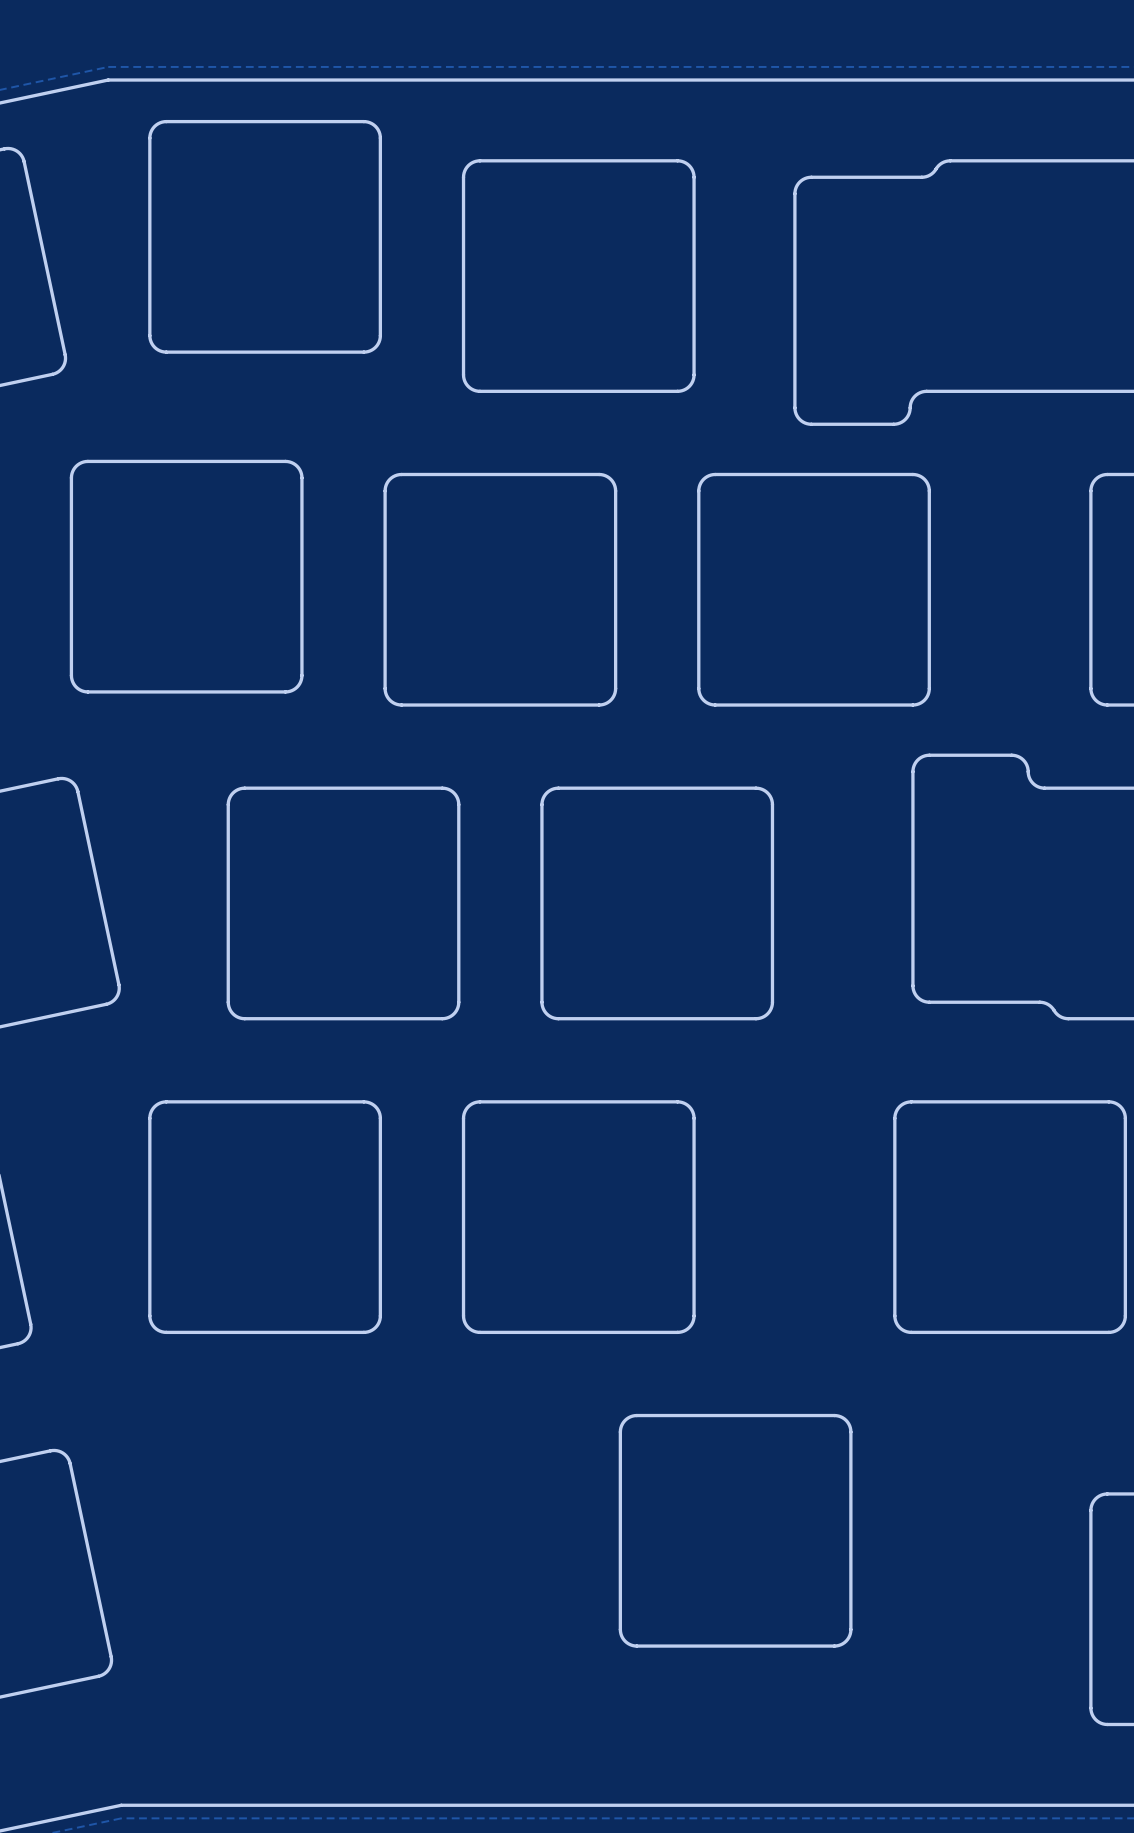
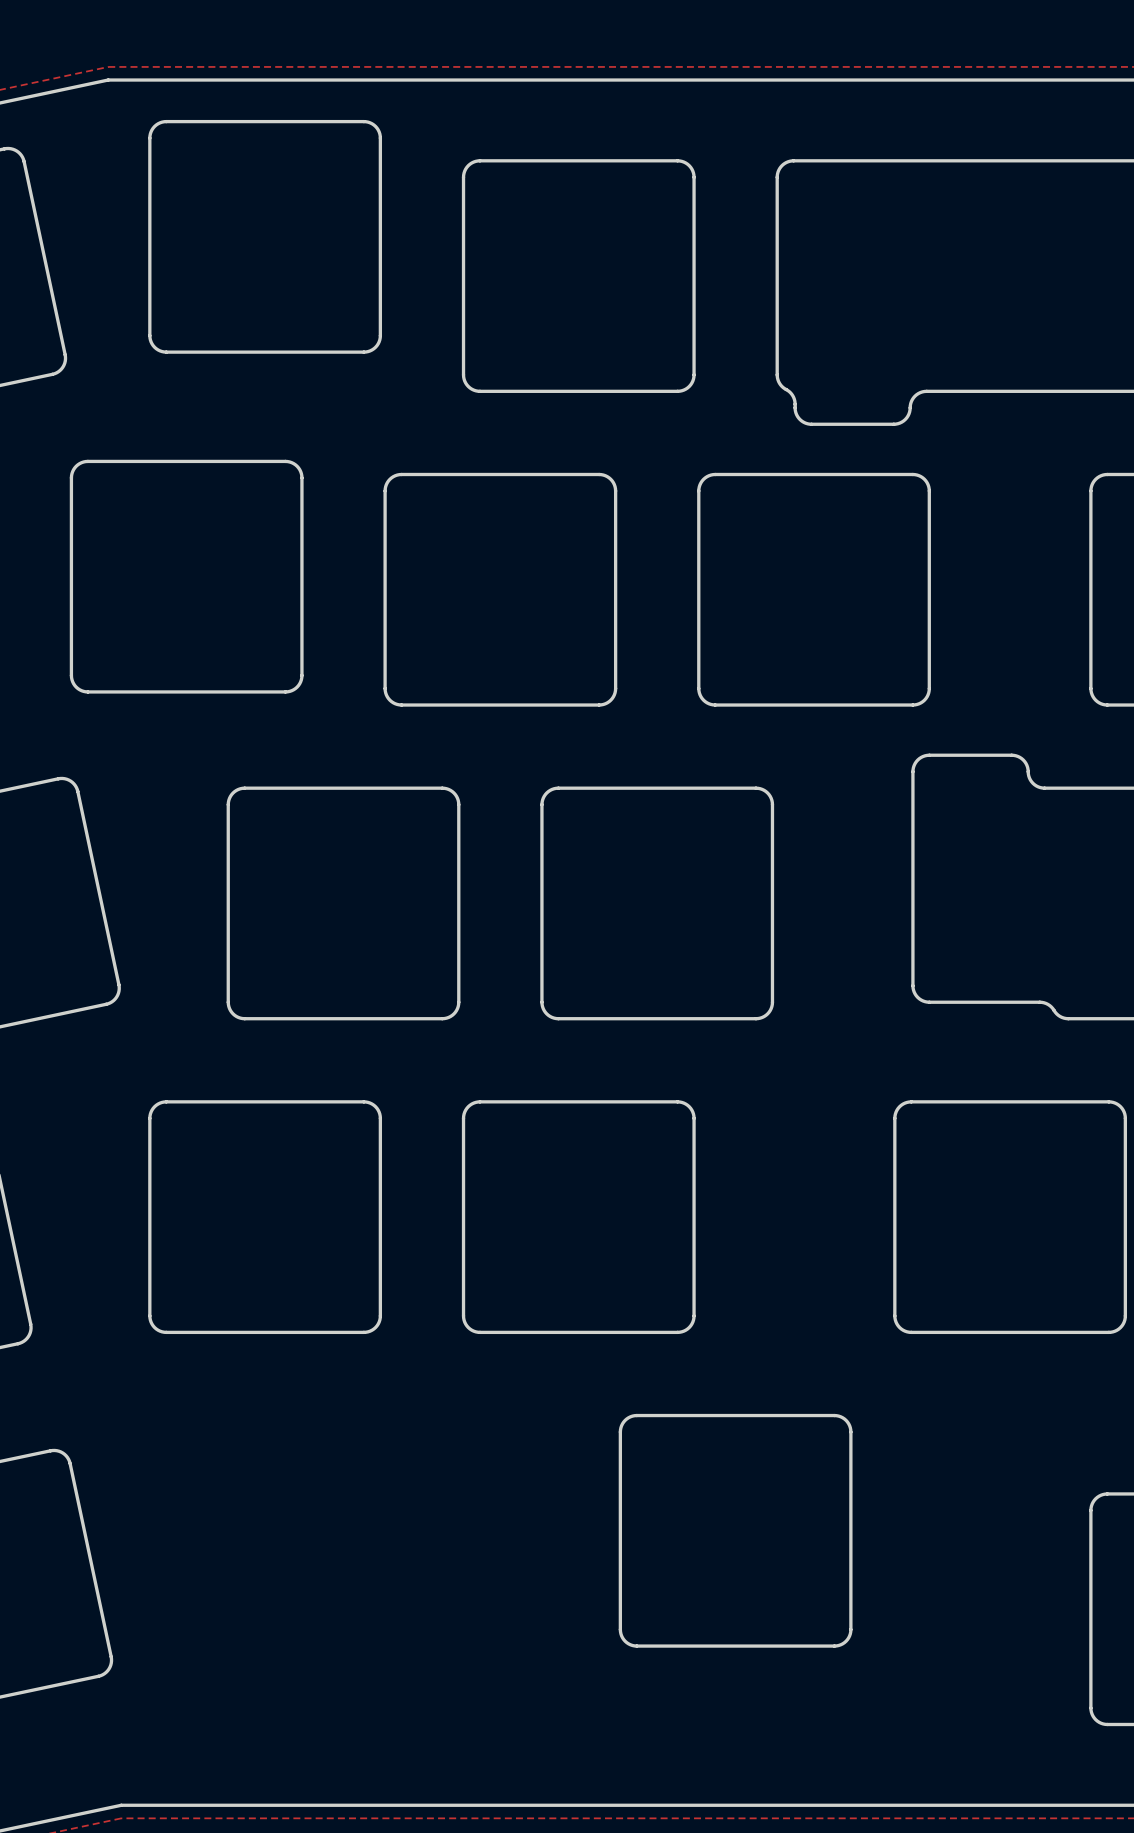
board edge: none -> (793, 160) (950, 160)
board edge: (950, 160) (942, 163) (931, 173) (923, 177) (809, 177) (803, 179) (797, 185) (794, 193) (794, 407) (799, 419) (811, 424) -> (793, 160) (782, 165) (777, 175) (777, 376) (780, 384) (793, 397) (795, 411) (798, 418) (804, 422) (811, 424)

